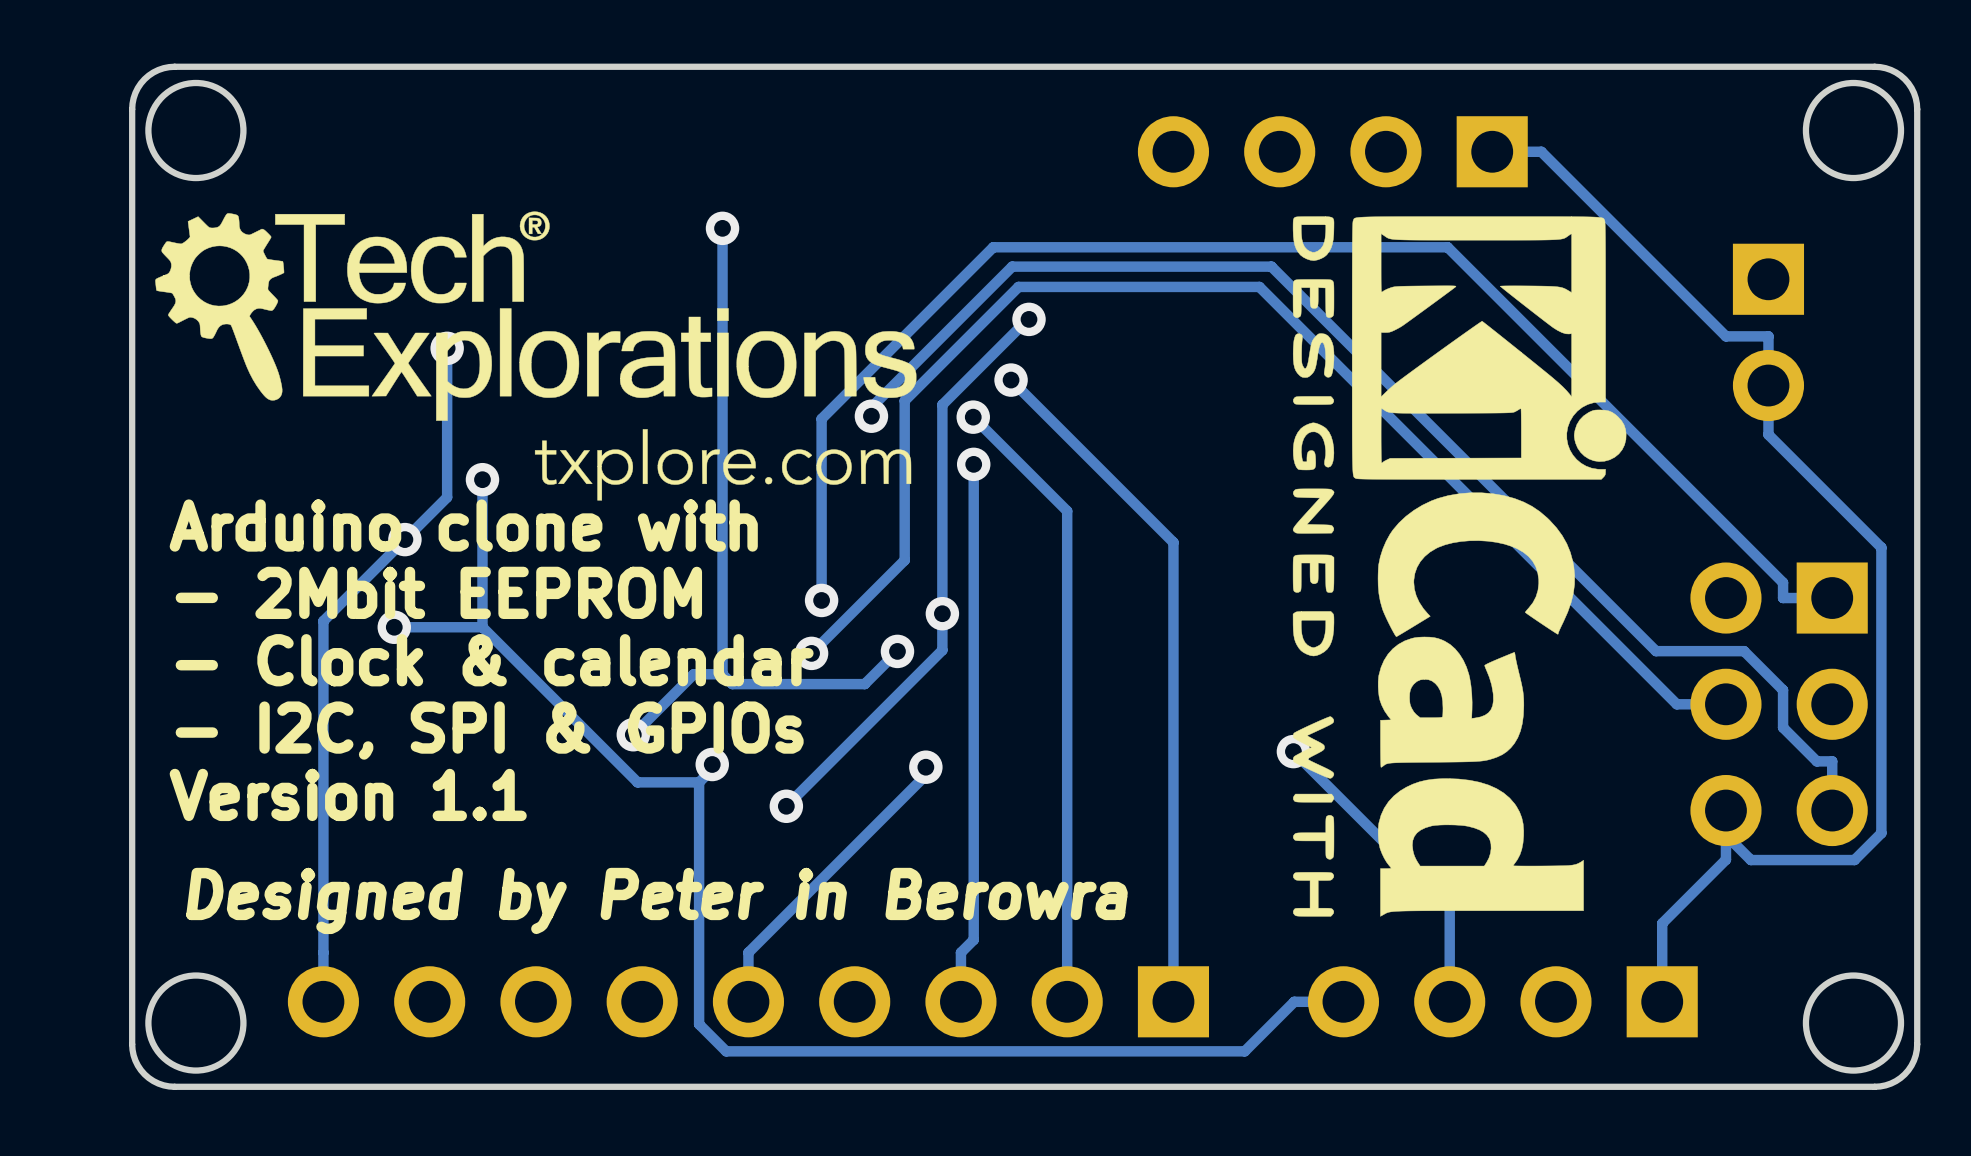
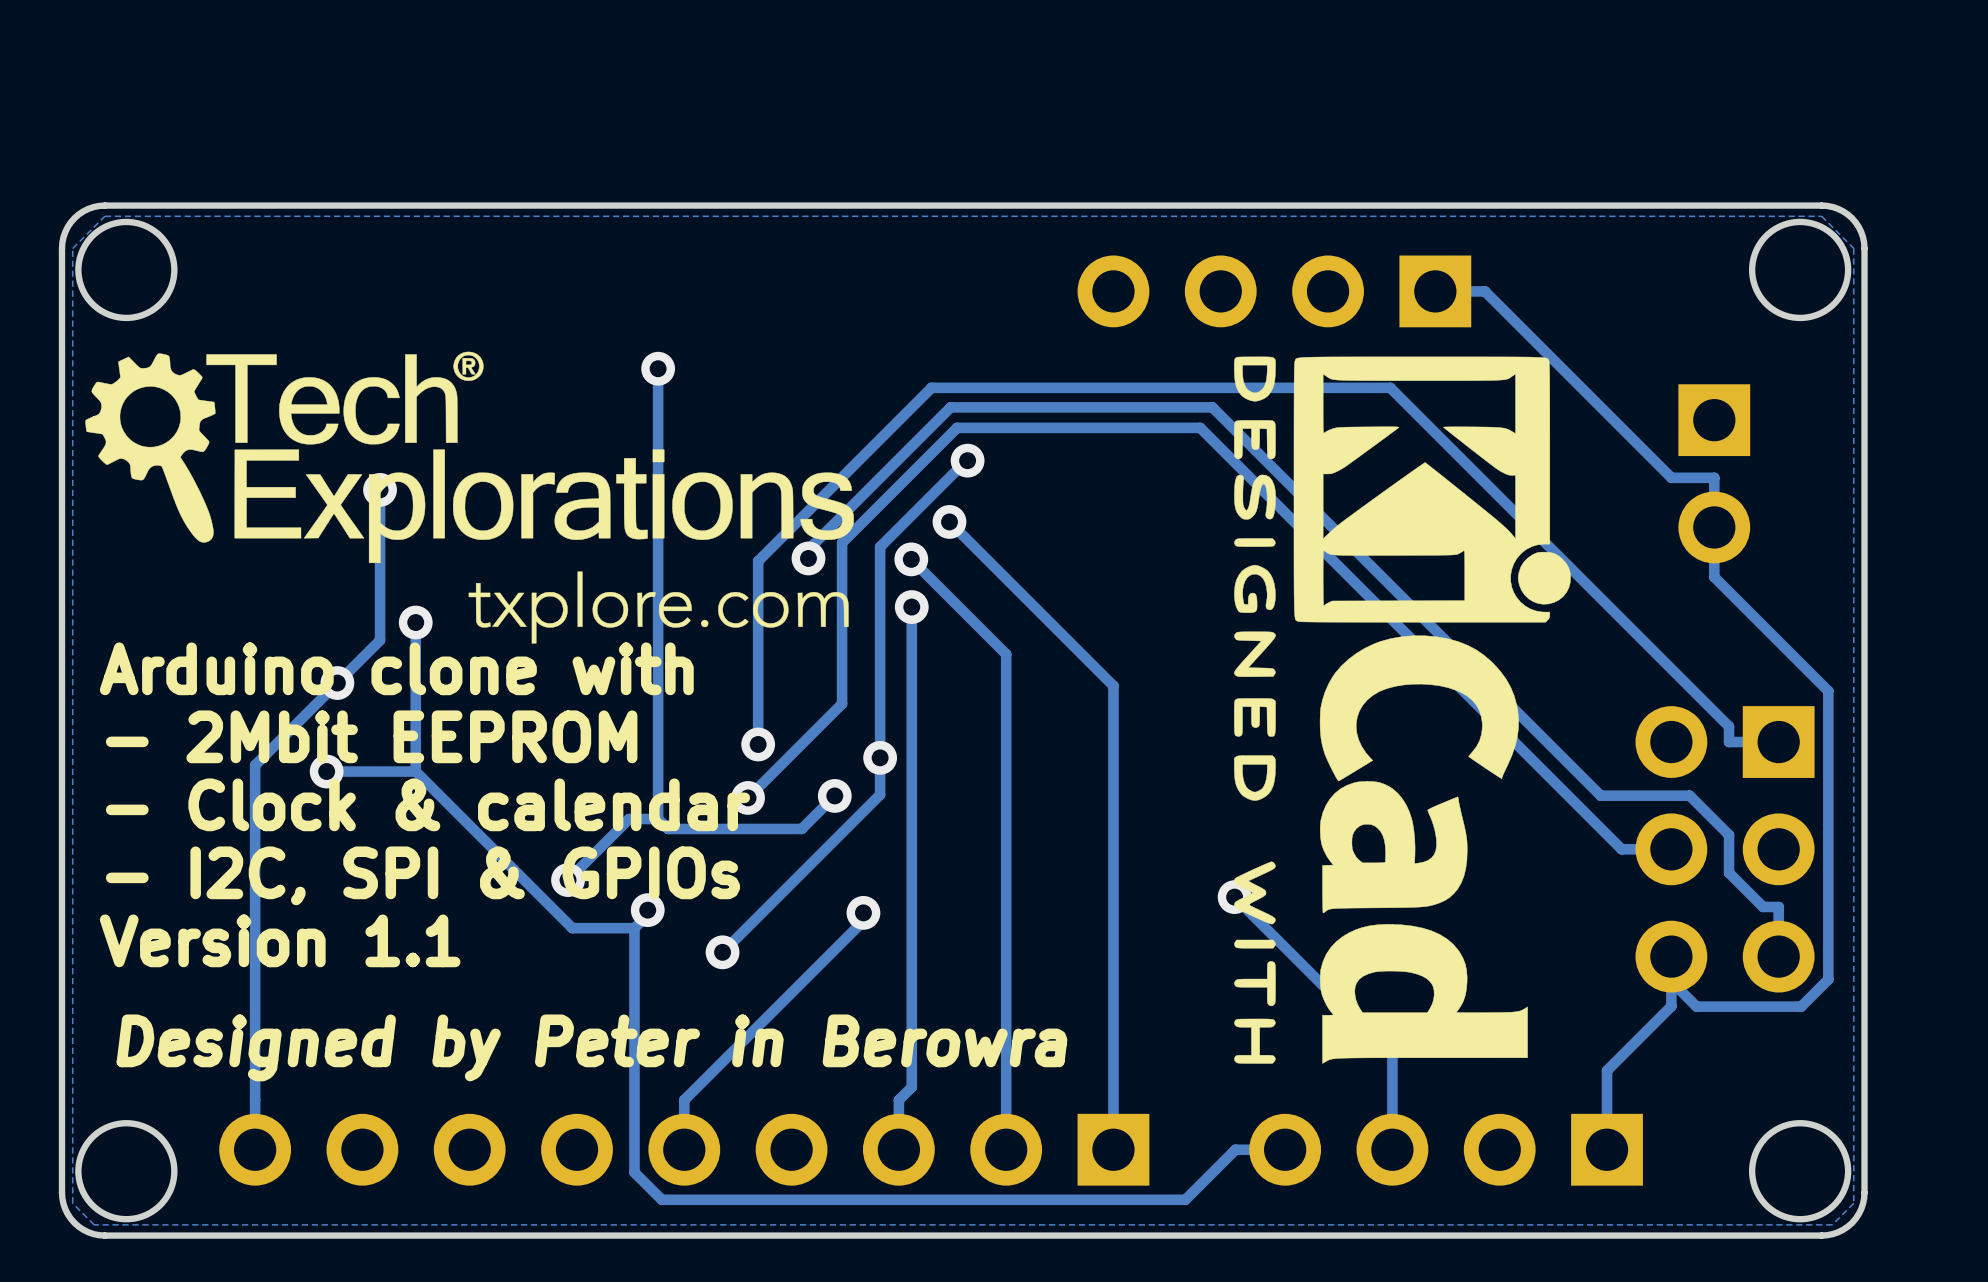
zone outline: none -> (1821, 216) (104, 216) (72, 248) (72, 1203) (94, 1224) (1832, 1224) (1853, 1203) (1853, 248) (1821, 216)

